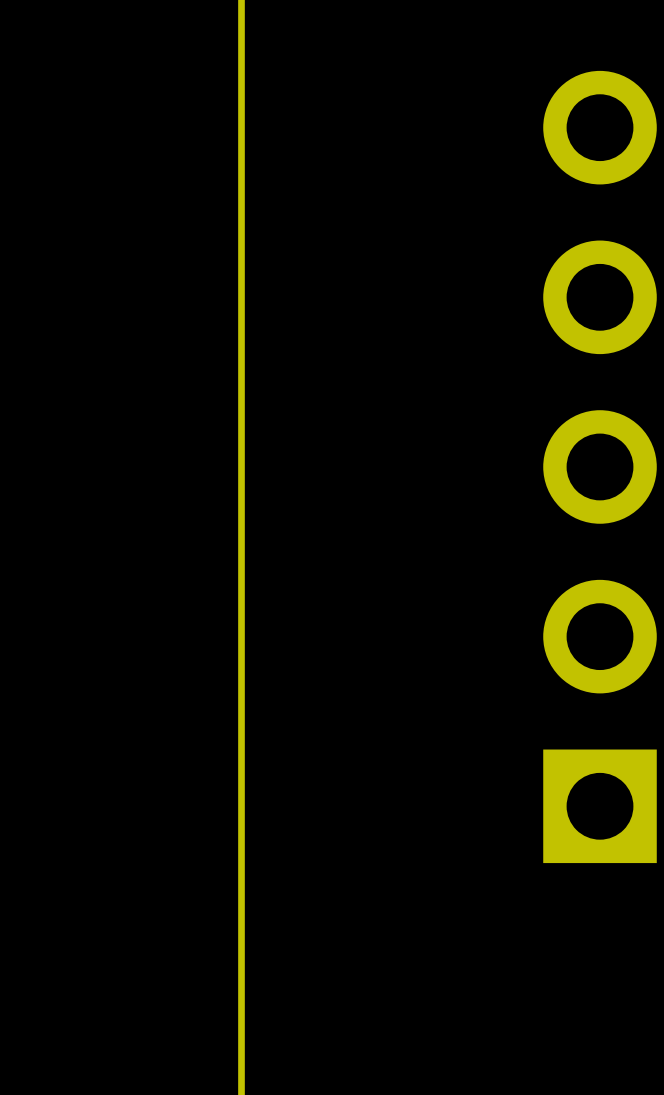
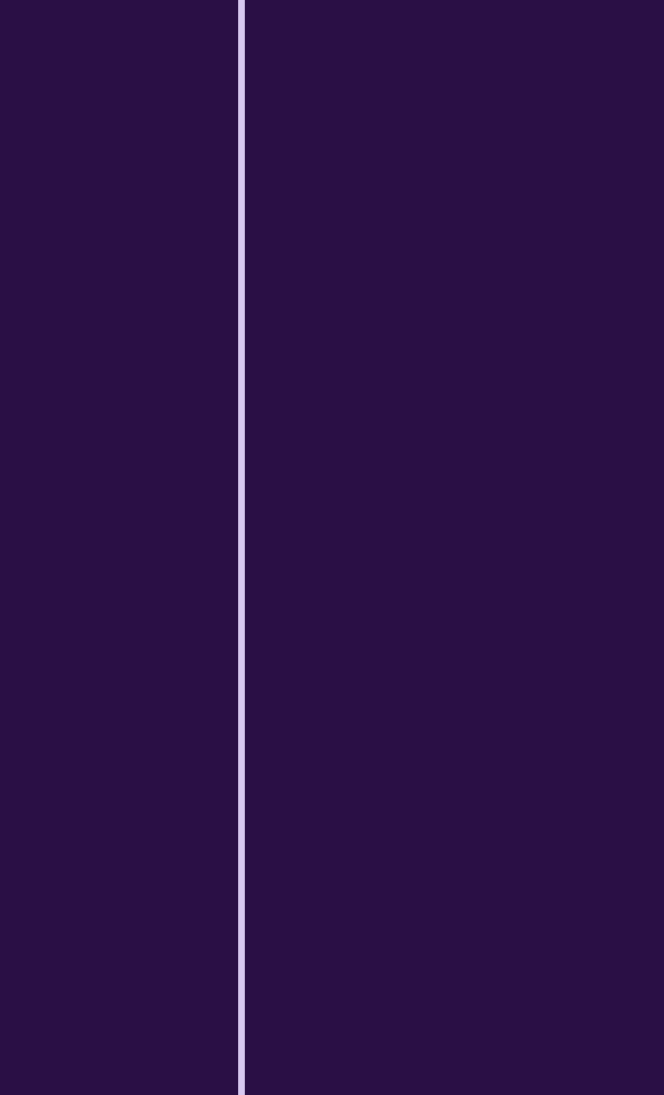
part: (600, 466) -> none

